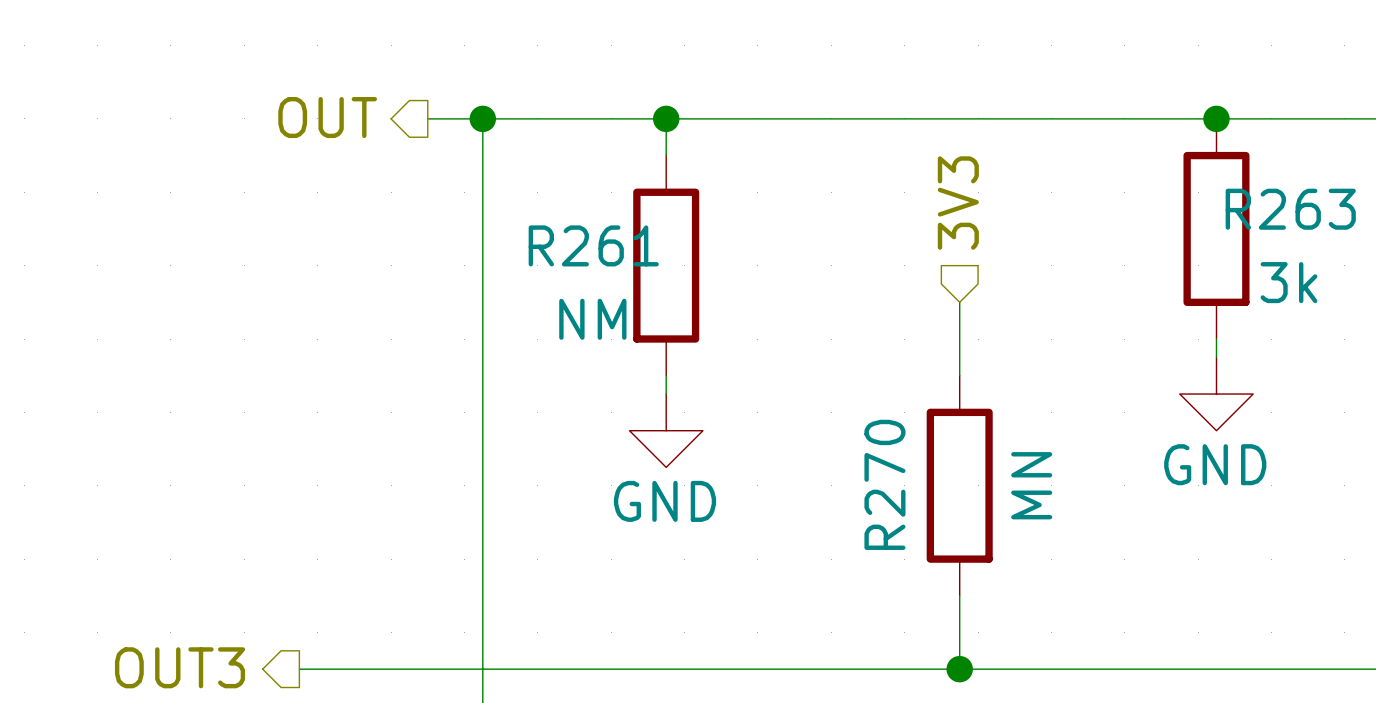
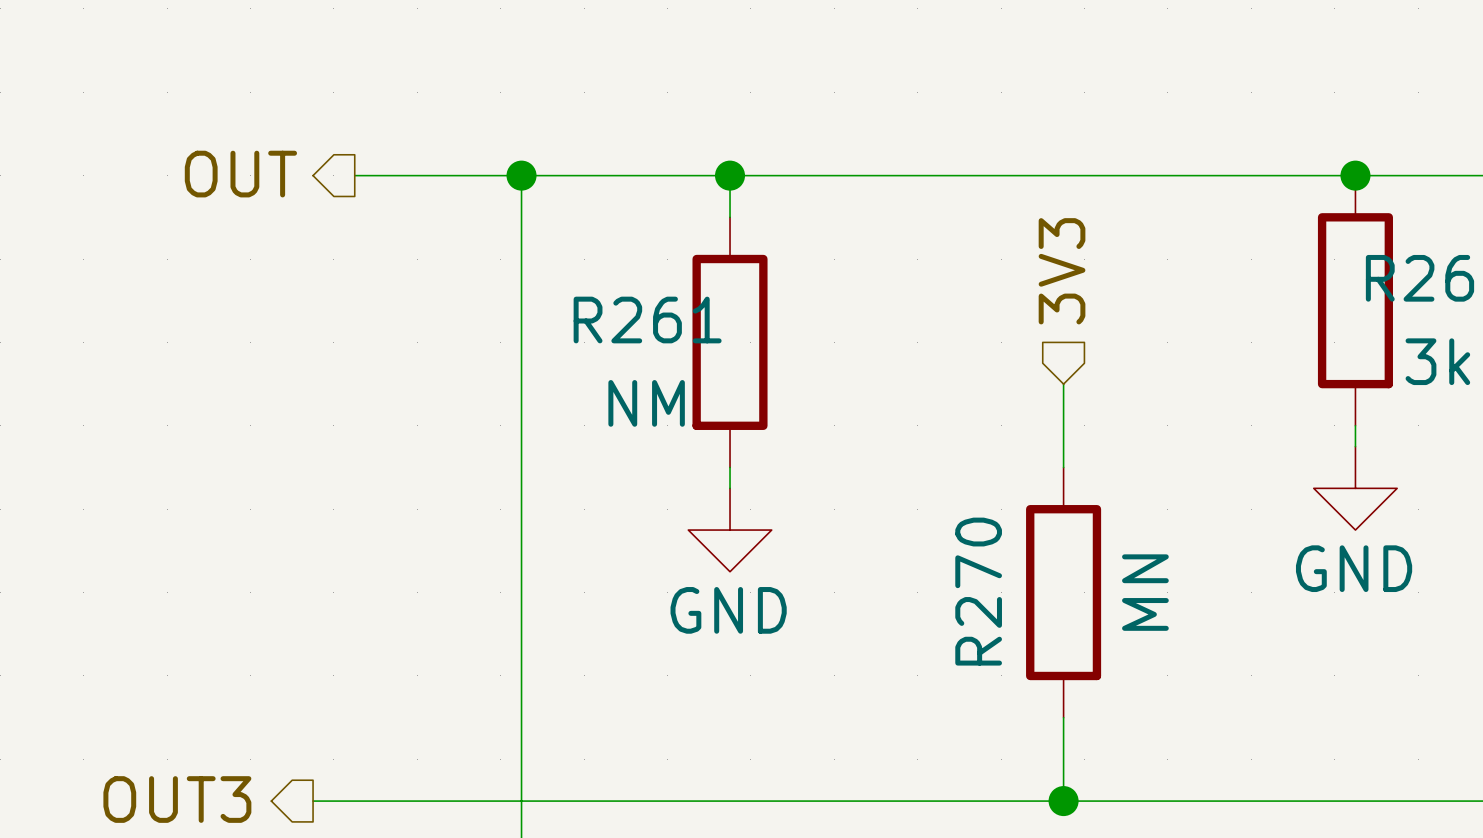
hierarchical label position: OUT (327, 117) -> OUT (240, 174)
wire: none -> (354, 175) (458, 175)

